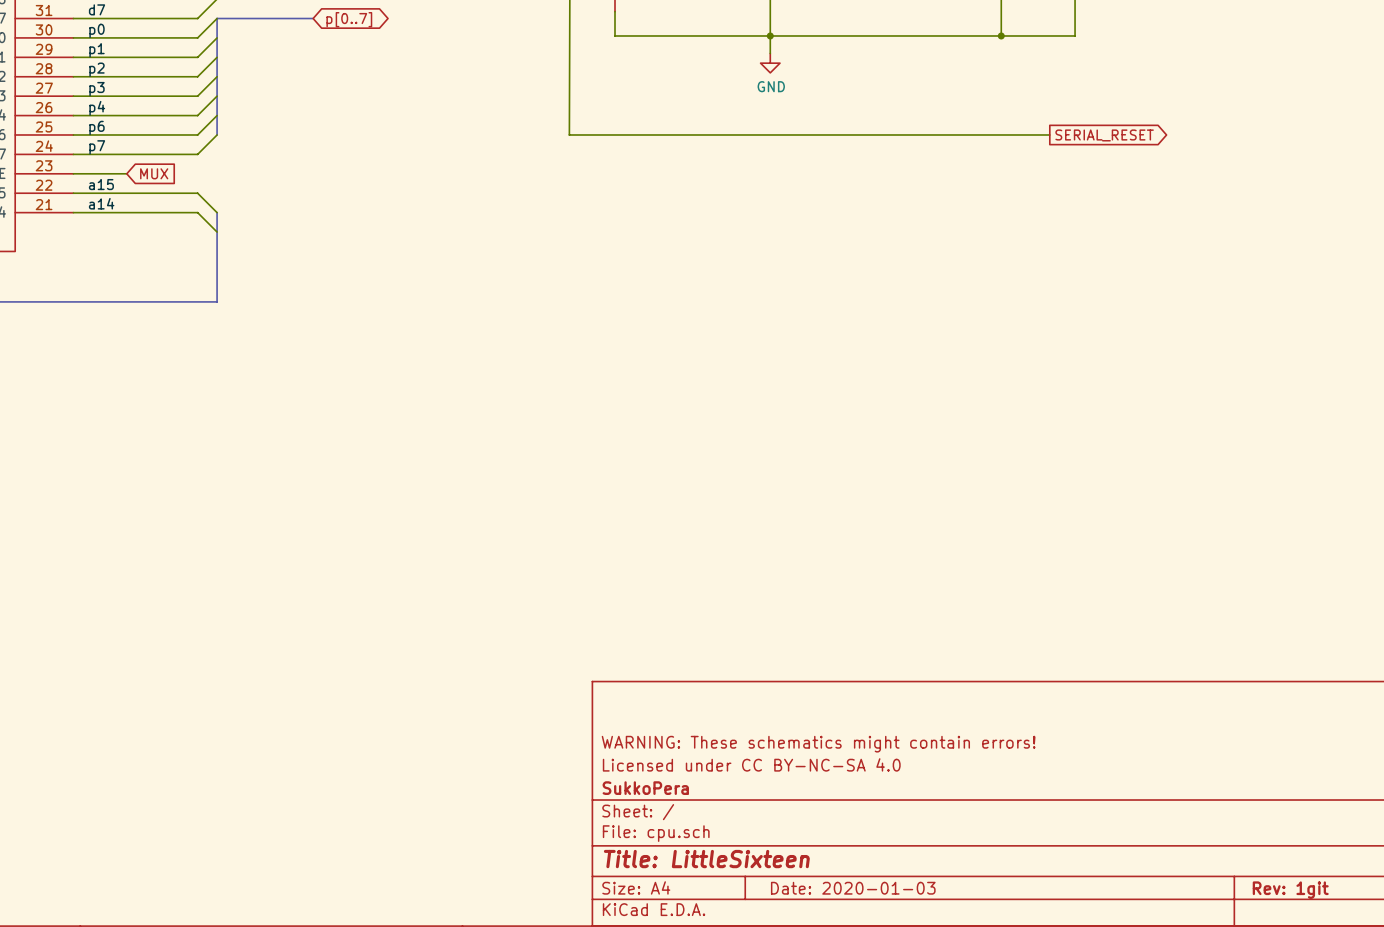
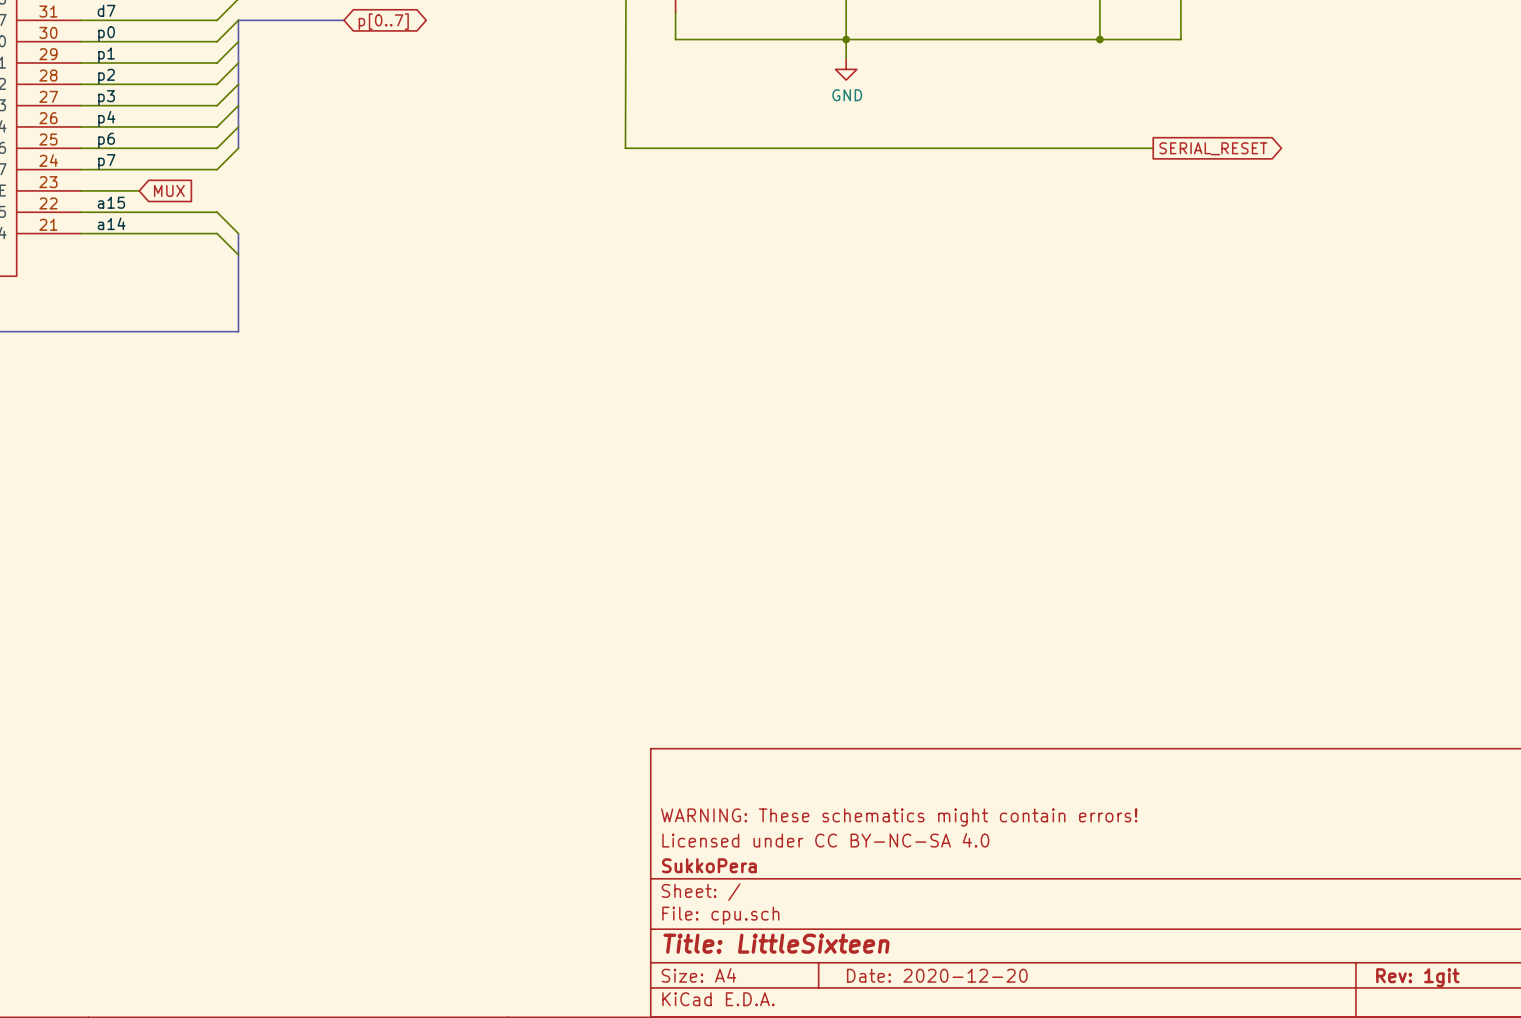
title block: Date: 2020-01-03 (853, 888) -> Date: 2020-12-20 (937, 975)

